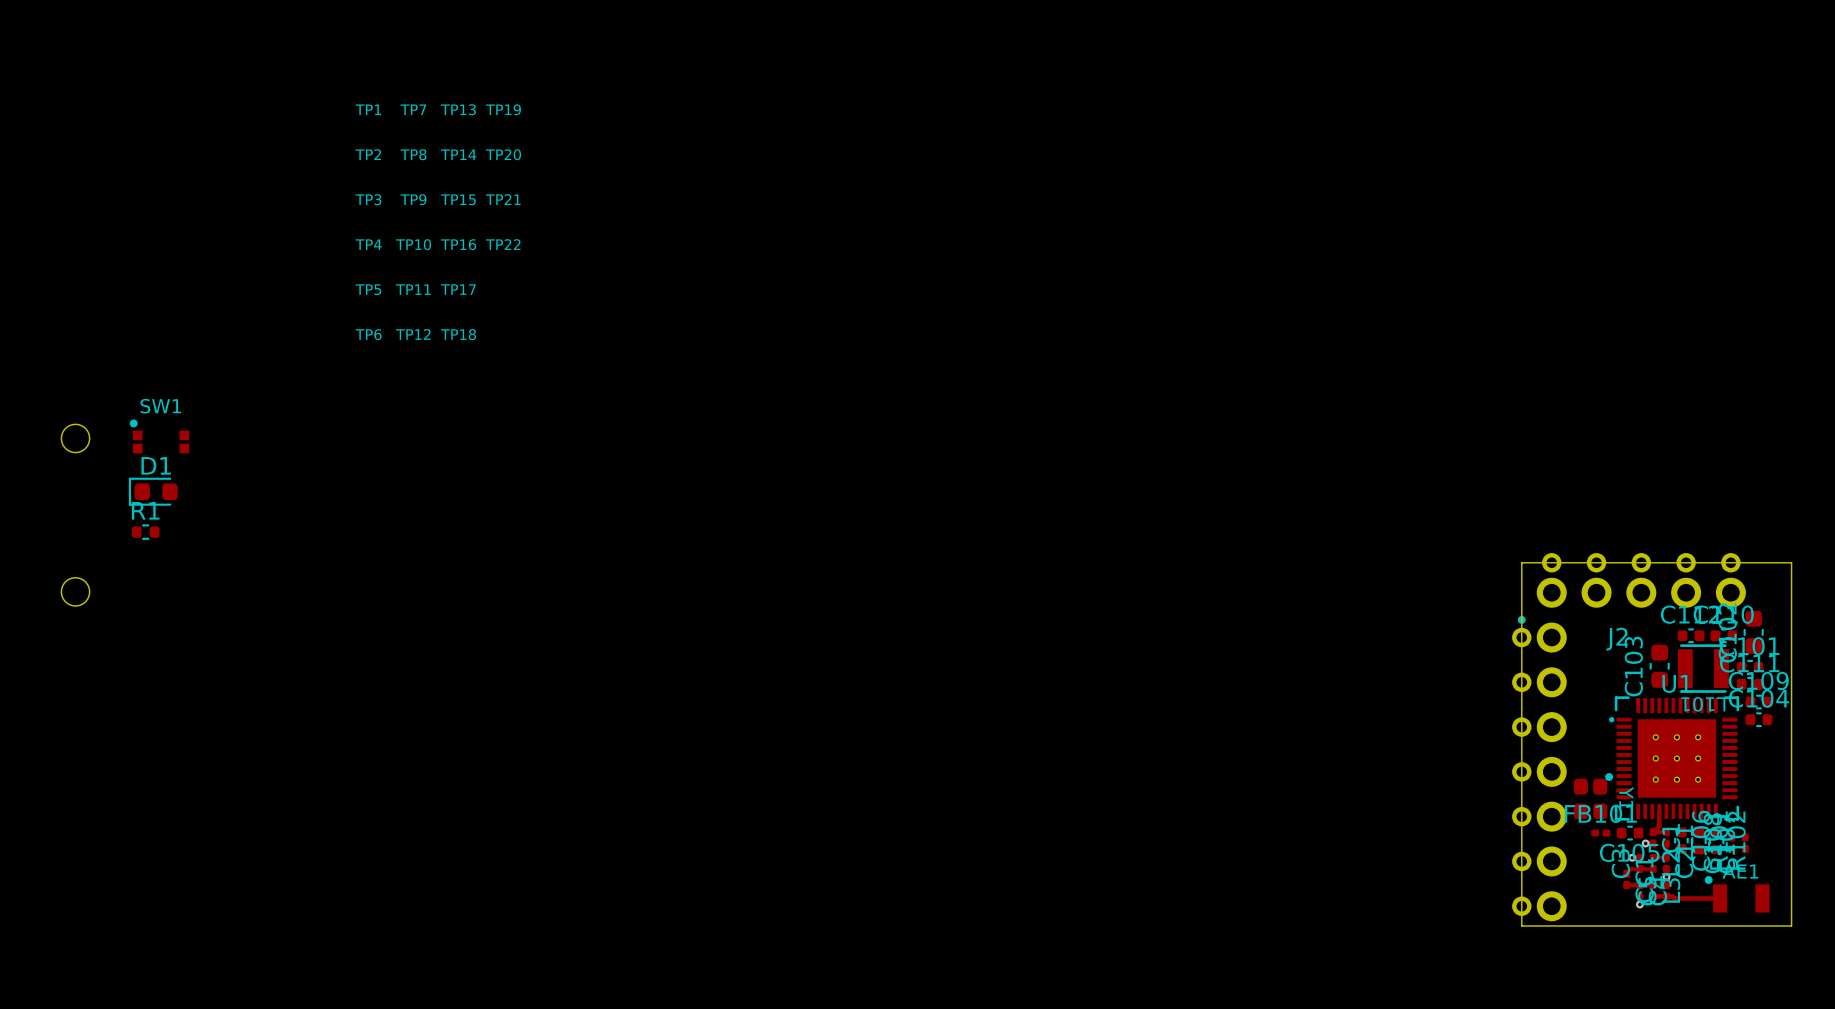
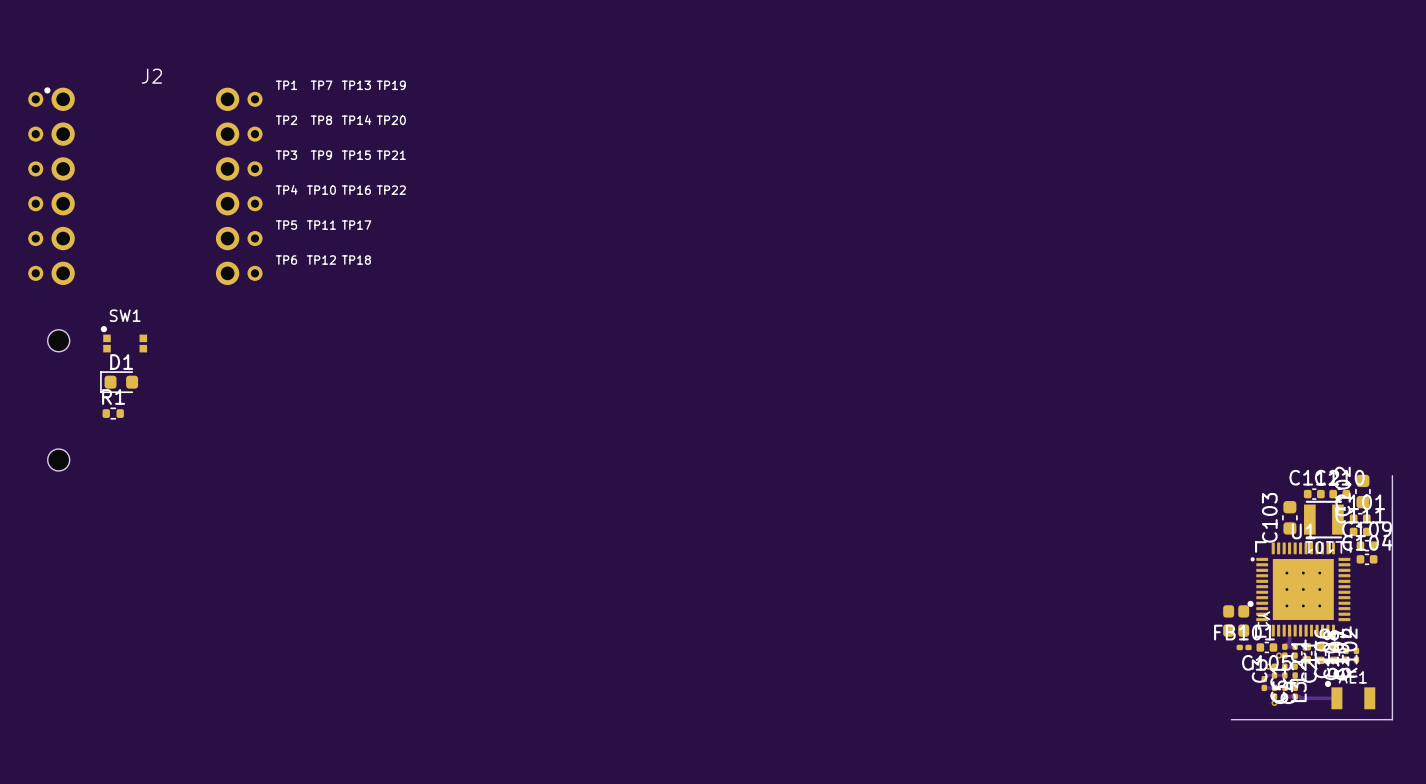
J2 footprint: [1512, 553, 1746, 922] -> [28, 87, 263, 286]
board edge: (1791, 612) (1791, 562) (1521, 562) (1521, 925) (1584, 925) -> none
J2 name position: J2 (1616, 639) -> J2 (151, 76)

